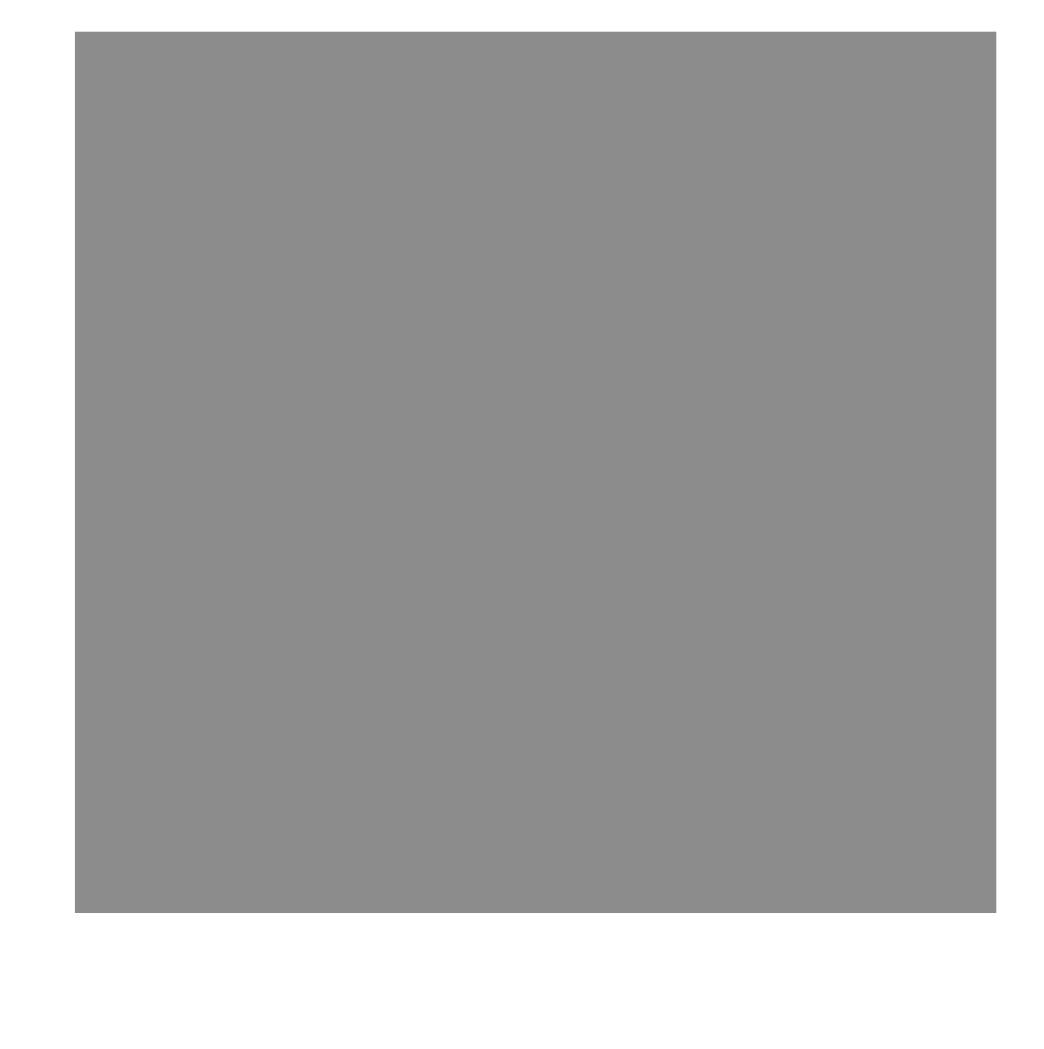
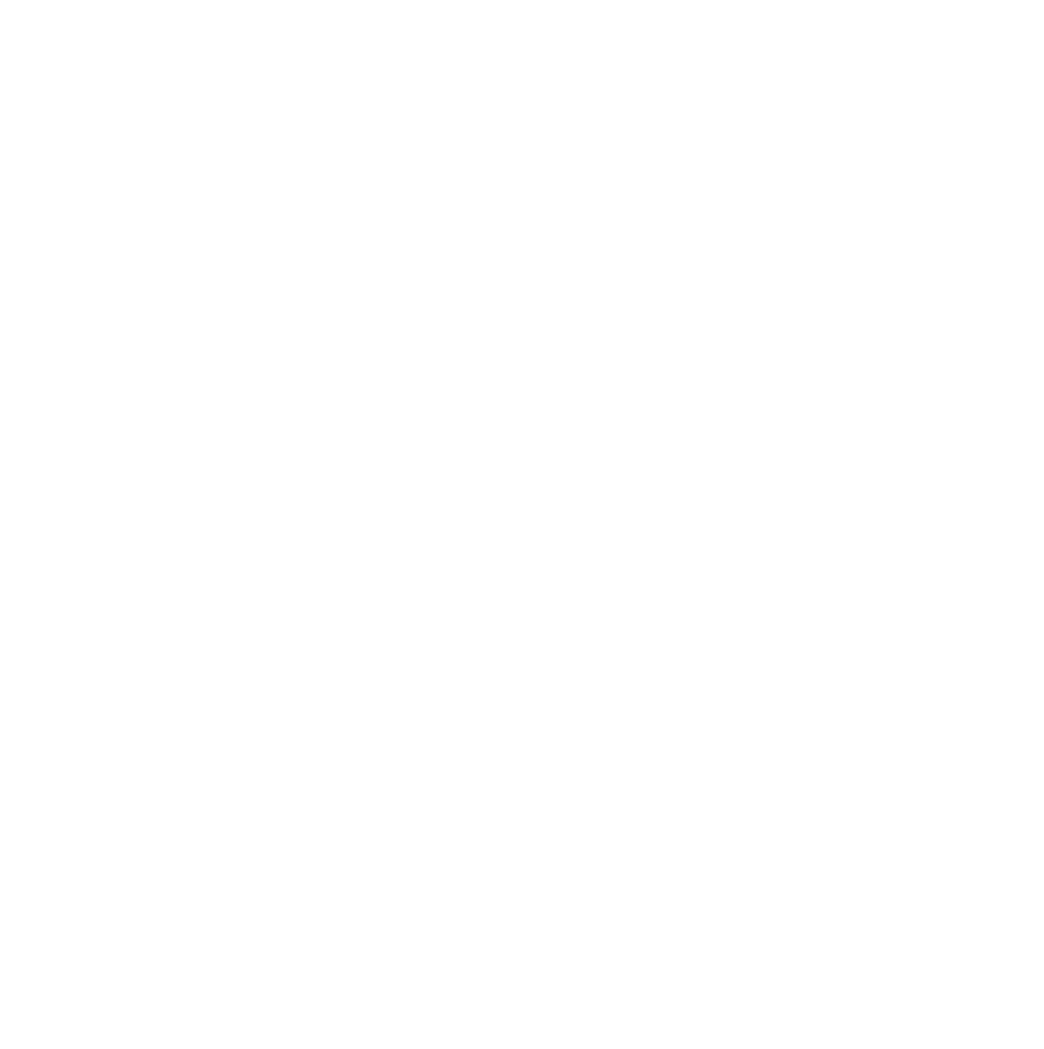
drawing: [74, 31, 997, 914] -> none

